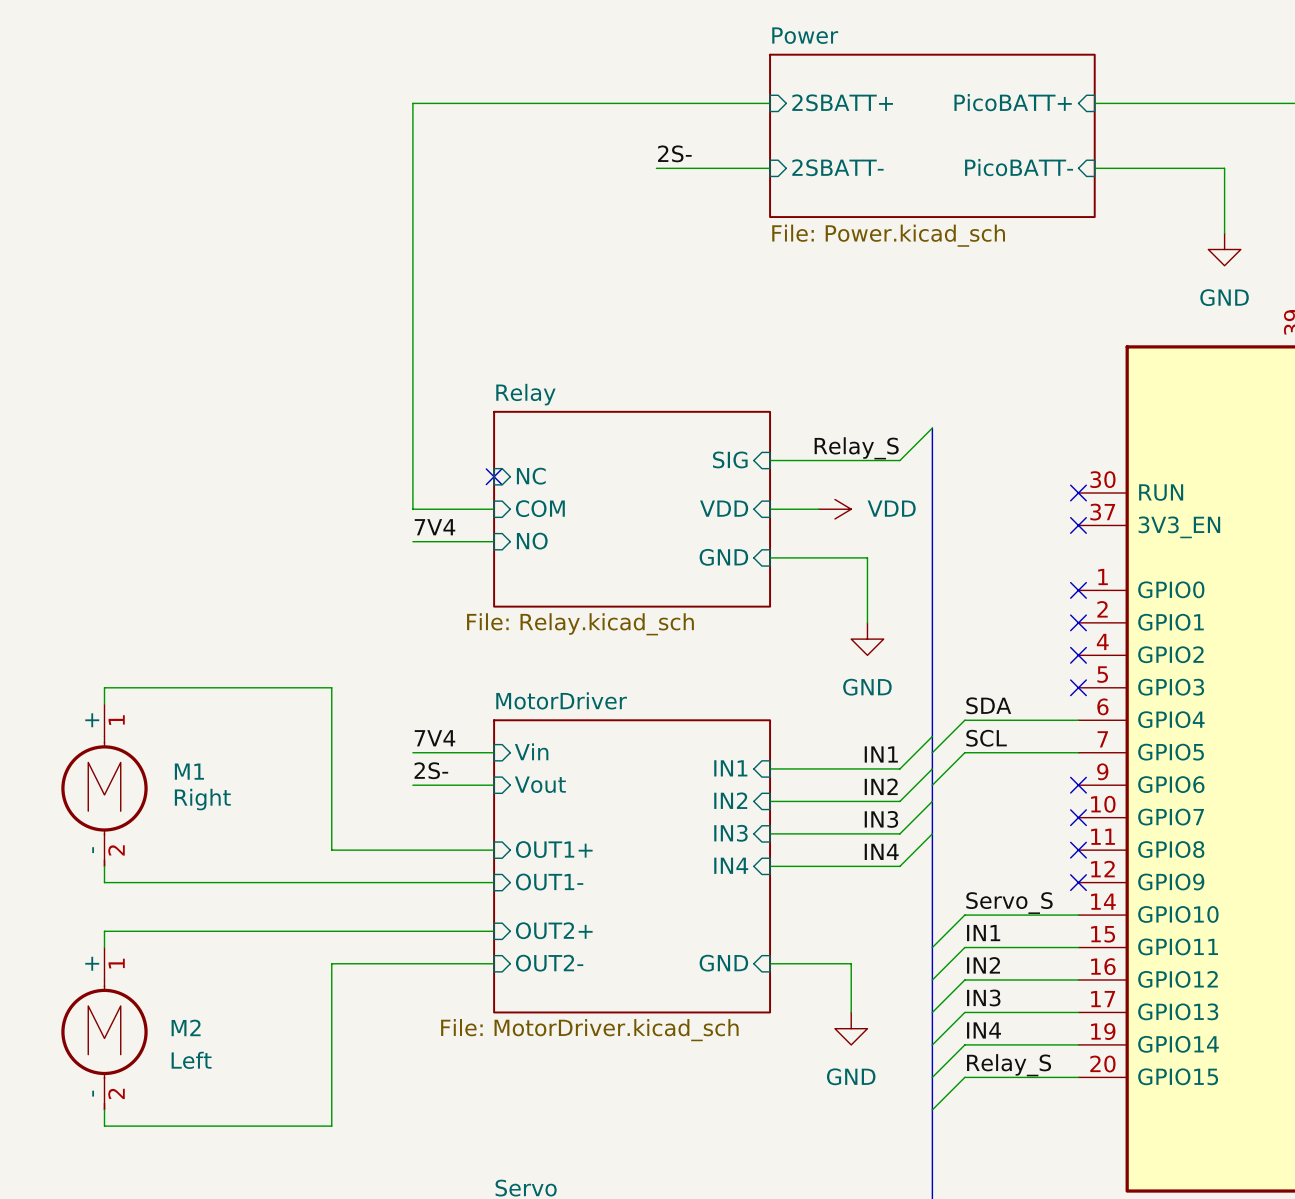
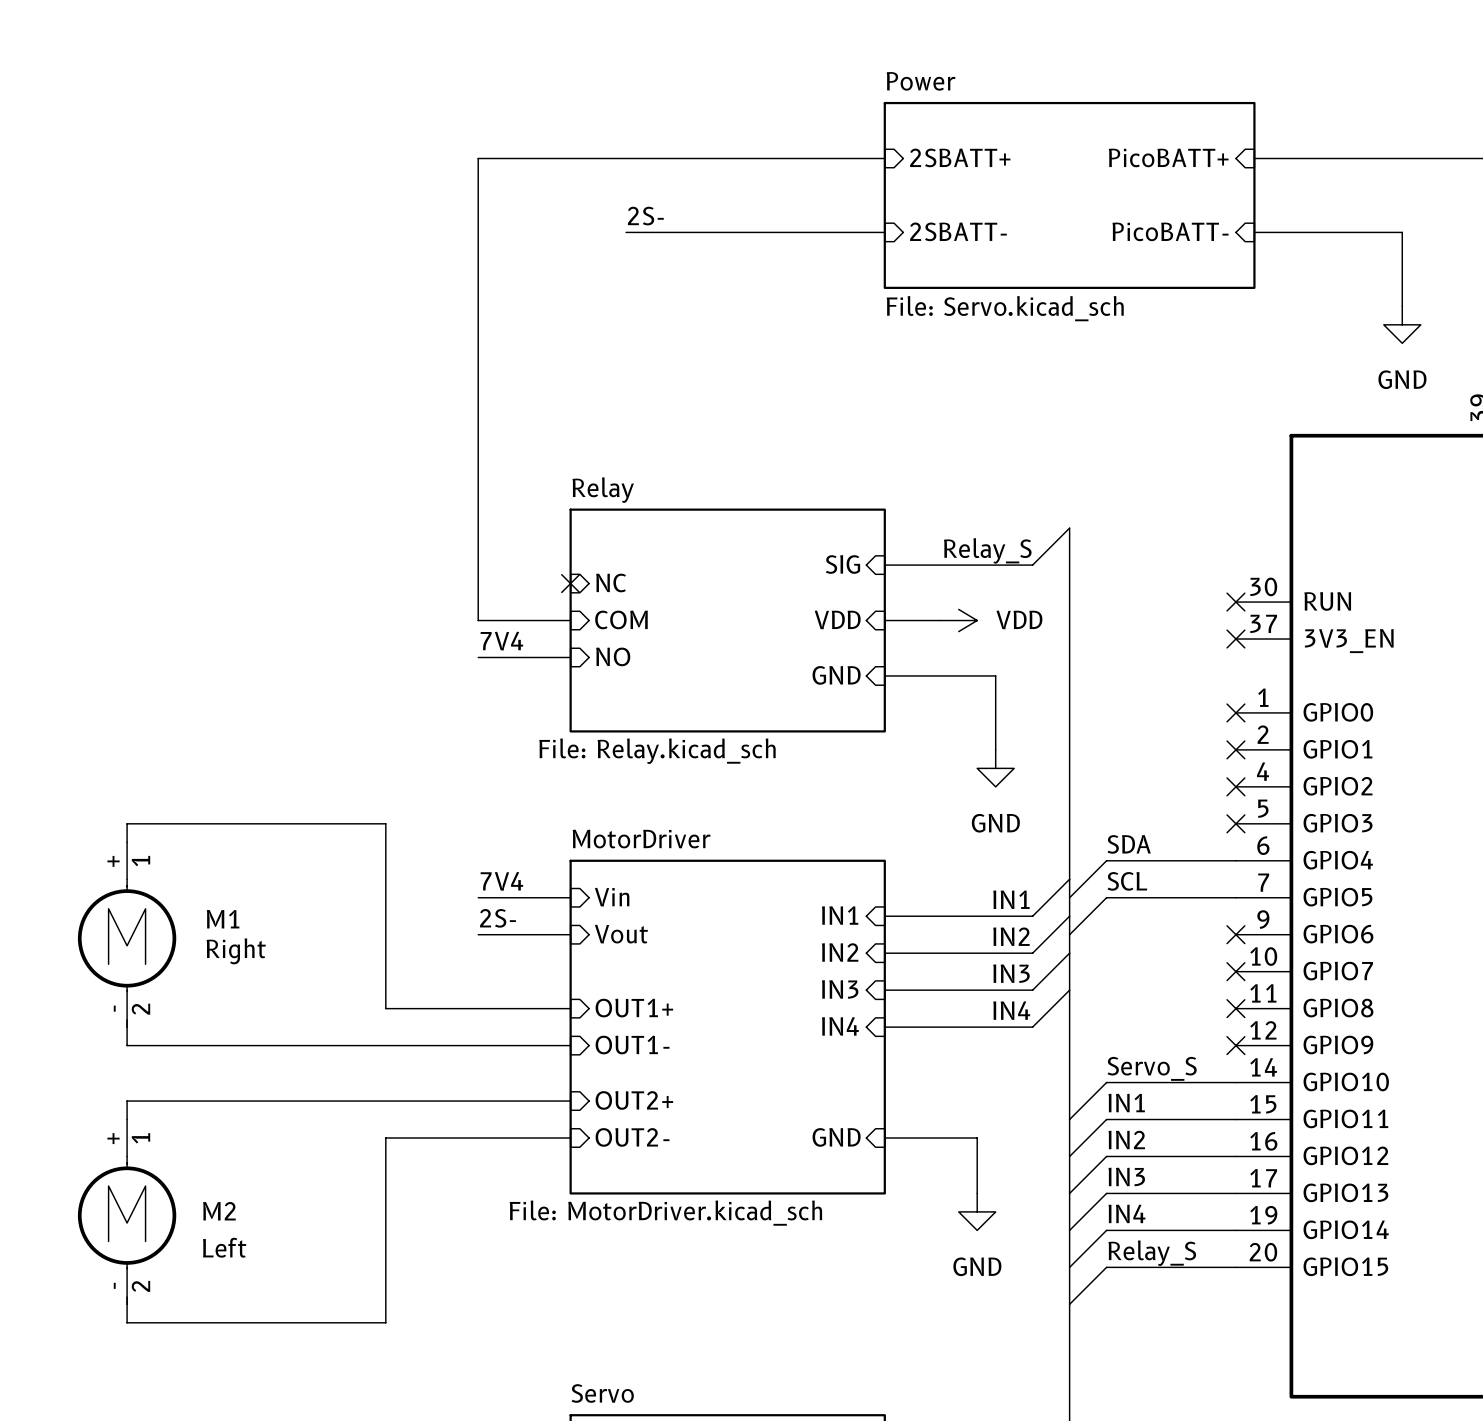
label position: 2S- (674, 153) -> 2S- (645, 216)
wire: none -> (626, 232) (755, 232)
sheet Power value: File: Power.kicad_sch (888, 235) -> File: Servo.kicad_sch (1005, 308)

